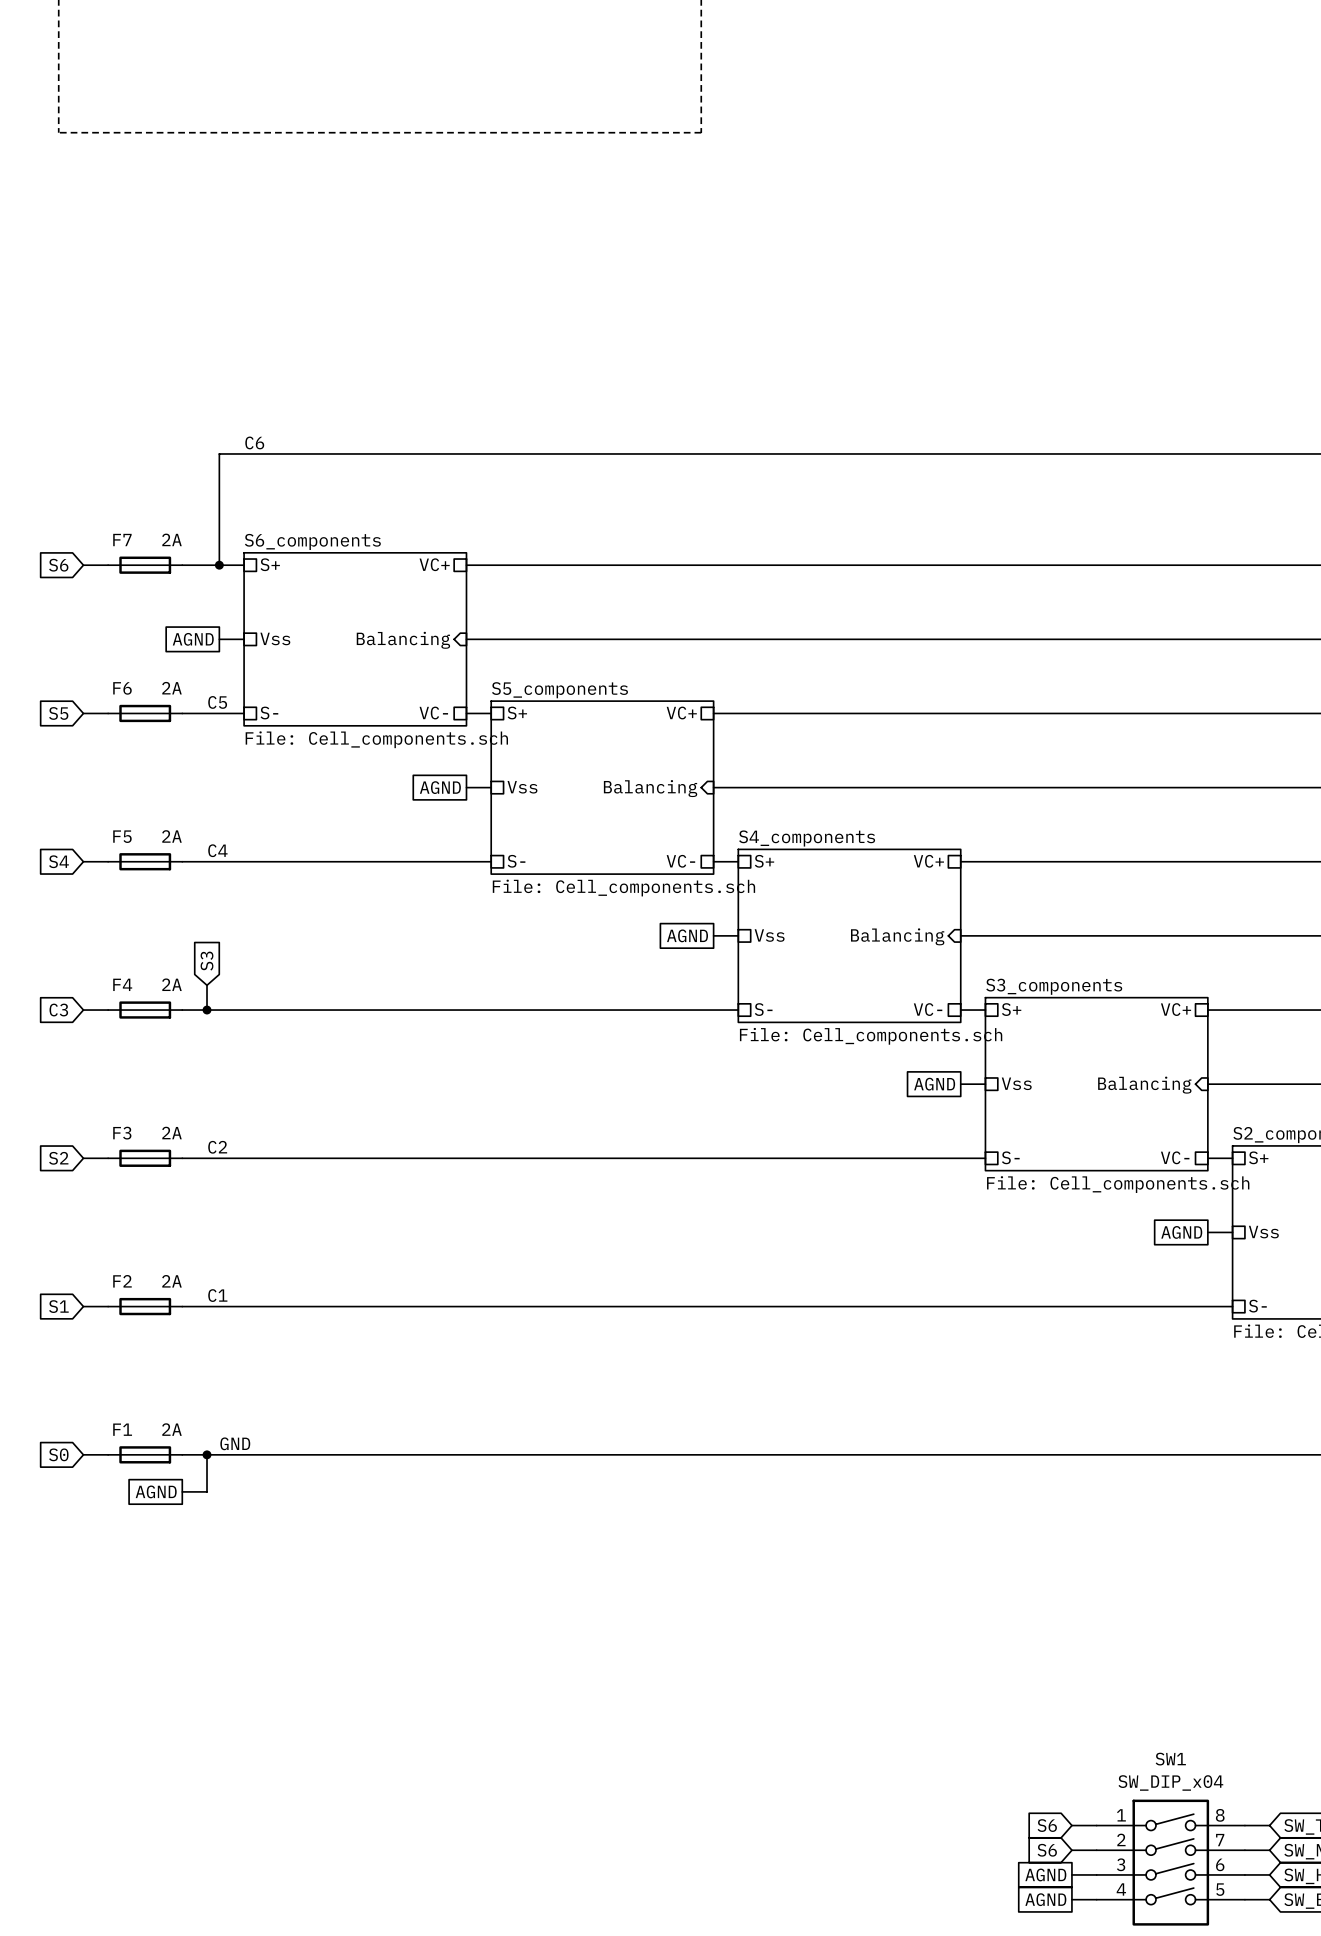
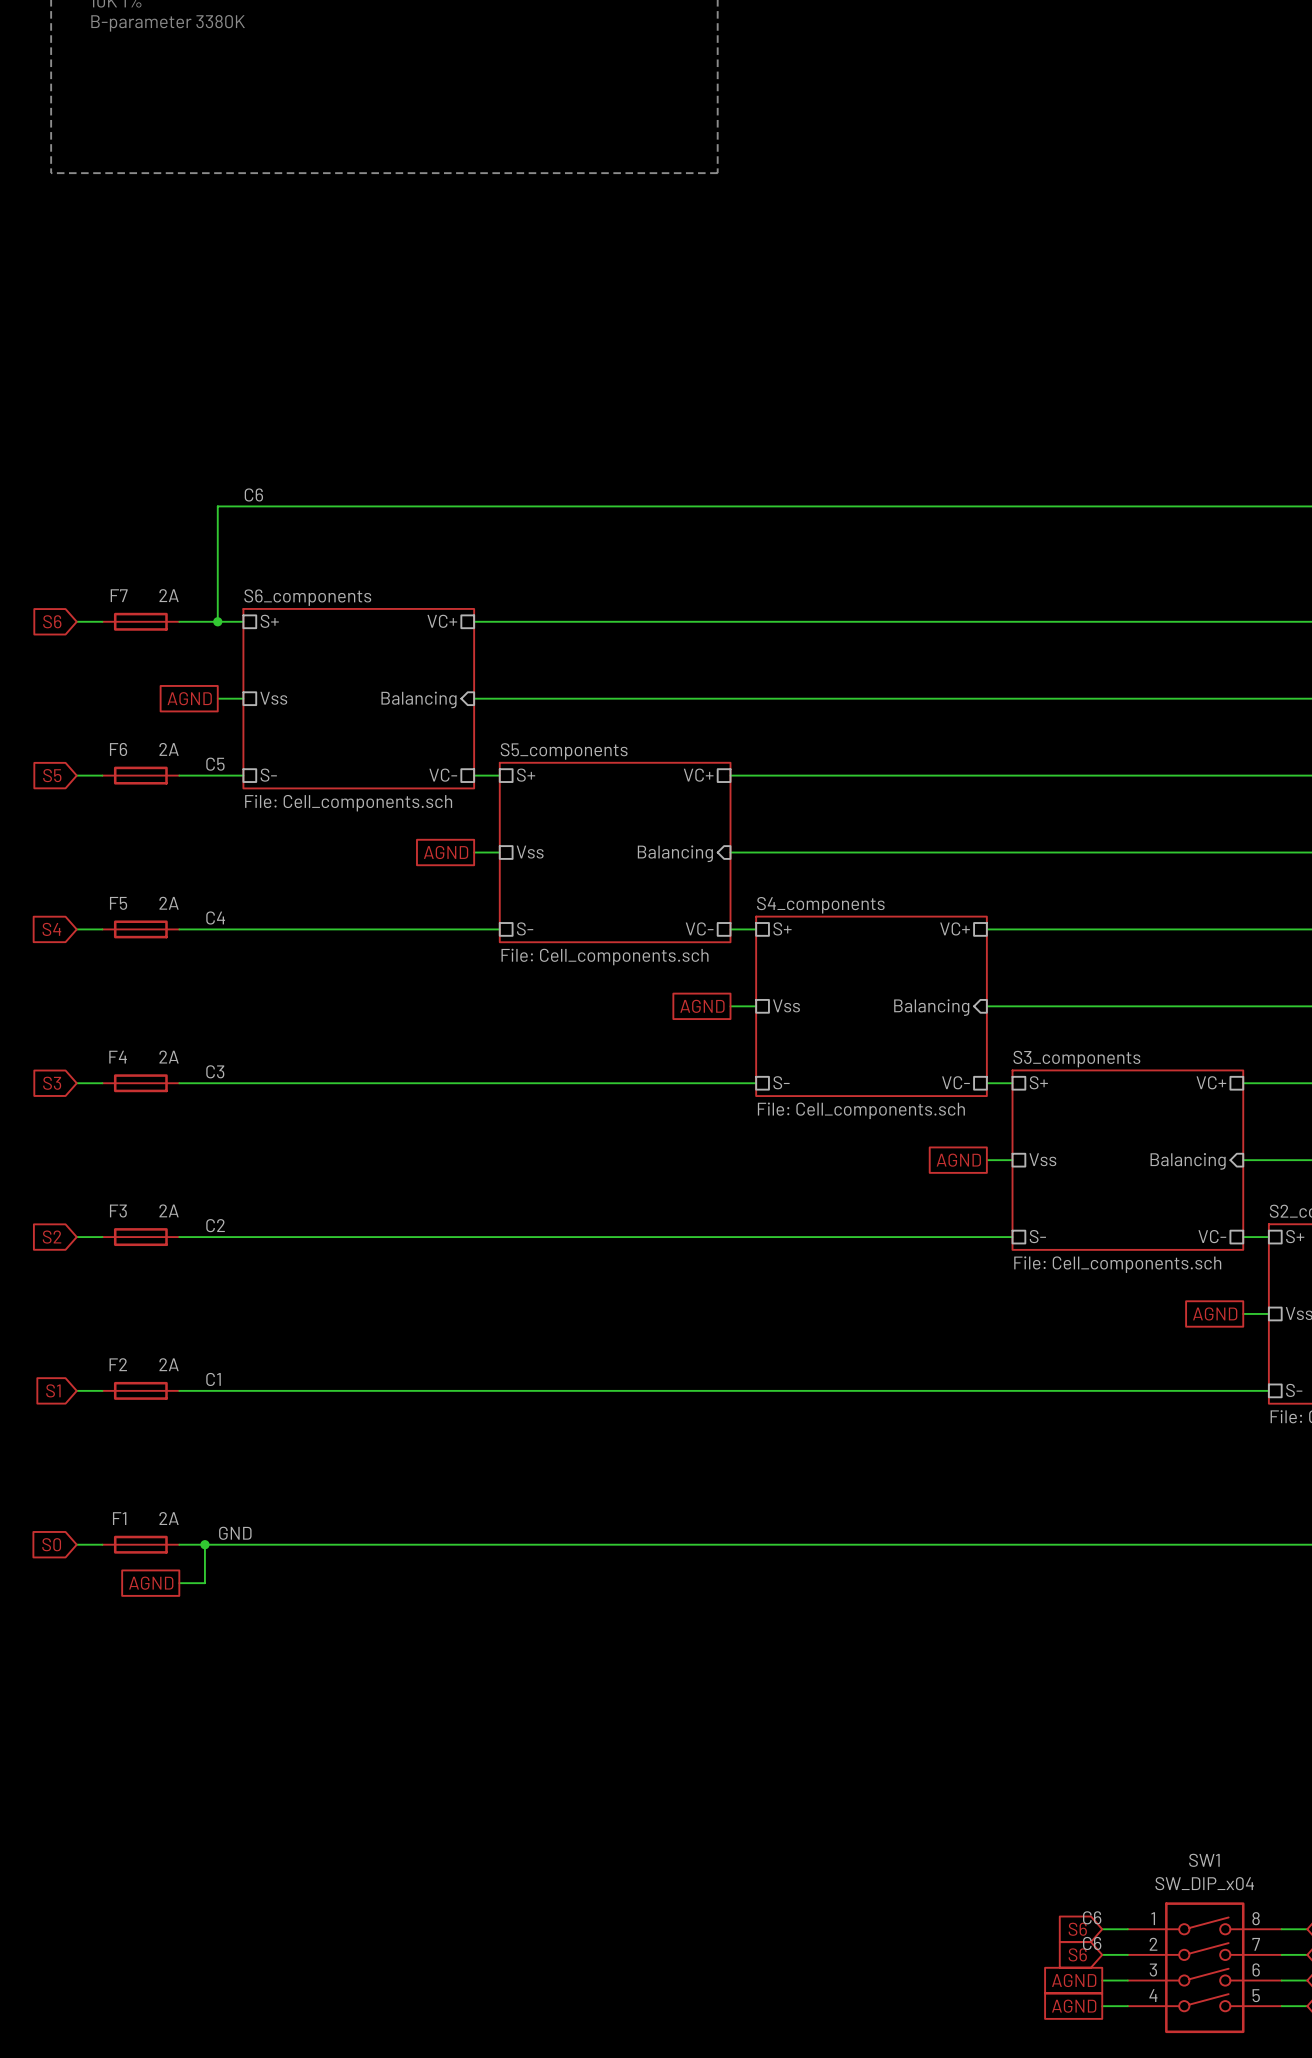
global label: S3 (207, 961) -> none
wire: (207, 985) (207, 1010) -> none
label: none -> C3 (215, 1071)
global label: C3 (58, 1010) -> S3 (52, 1083)
junction: (207, 1010) -> none
label: none -> C6 (1092, 1917)
label: none -> C6 (1092, 1943)

